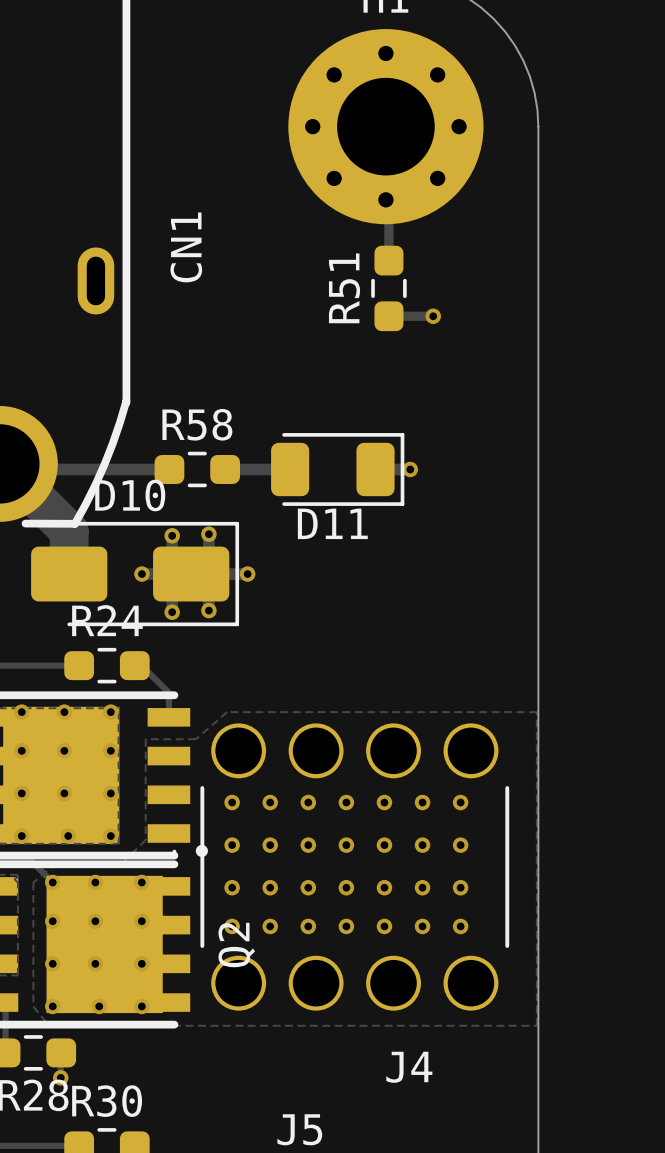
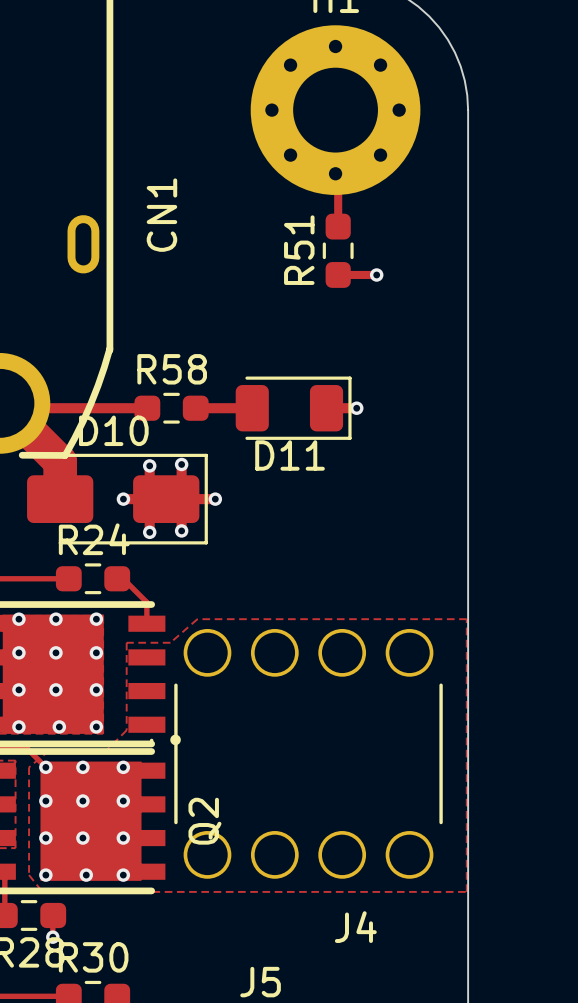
via: (232, 802) -> none
via: (270, 802) -> none
via: (308, 802) -> none
via: (346, 802) -> none
via: (384, 802) -> none
via: (422, 802) -> none
via: (460, 802) -> none
via: (232, 845) -> none
via: (270, 845) -> none
via: (308, 845) -> none
via: (346, 845) -> none
via: (384, 845) -> none
via: (422, 845) -> none
via: (460, 845) -> none
via: (232, 887) -> none
via: (270, 887) -> none
via: (308, 887) -> none
via: (346, 887) -> none
via: (384, 887) -> none
via: (422, 887) -> none
via: (460, 887) -> none
via: (232, 926) -> none
via: (270, 926) -> none
via: (308, 926) -> none
via: (346, 926) -> none
via: (384, 926) -> none
via: (422, 926) -> none
via: (460, 926) -> none

